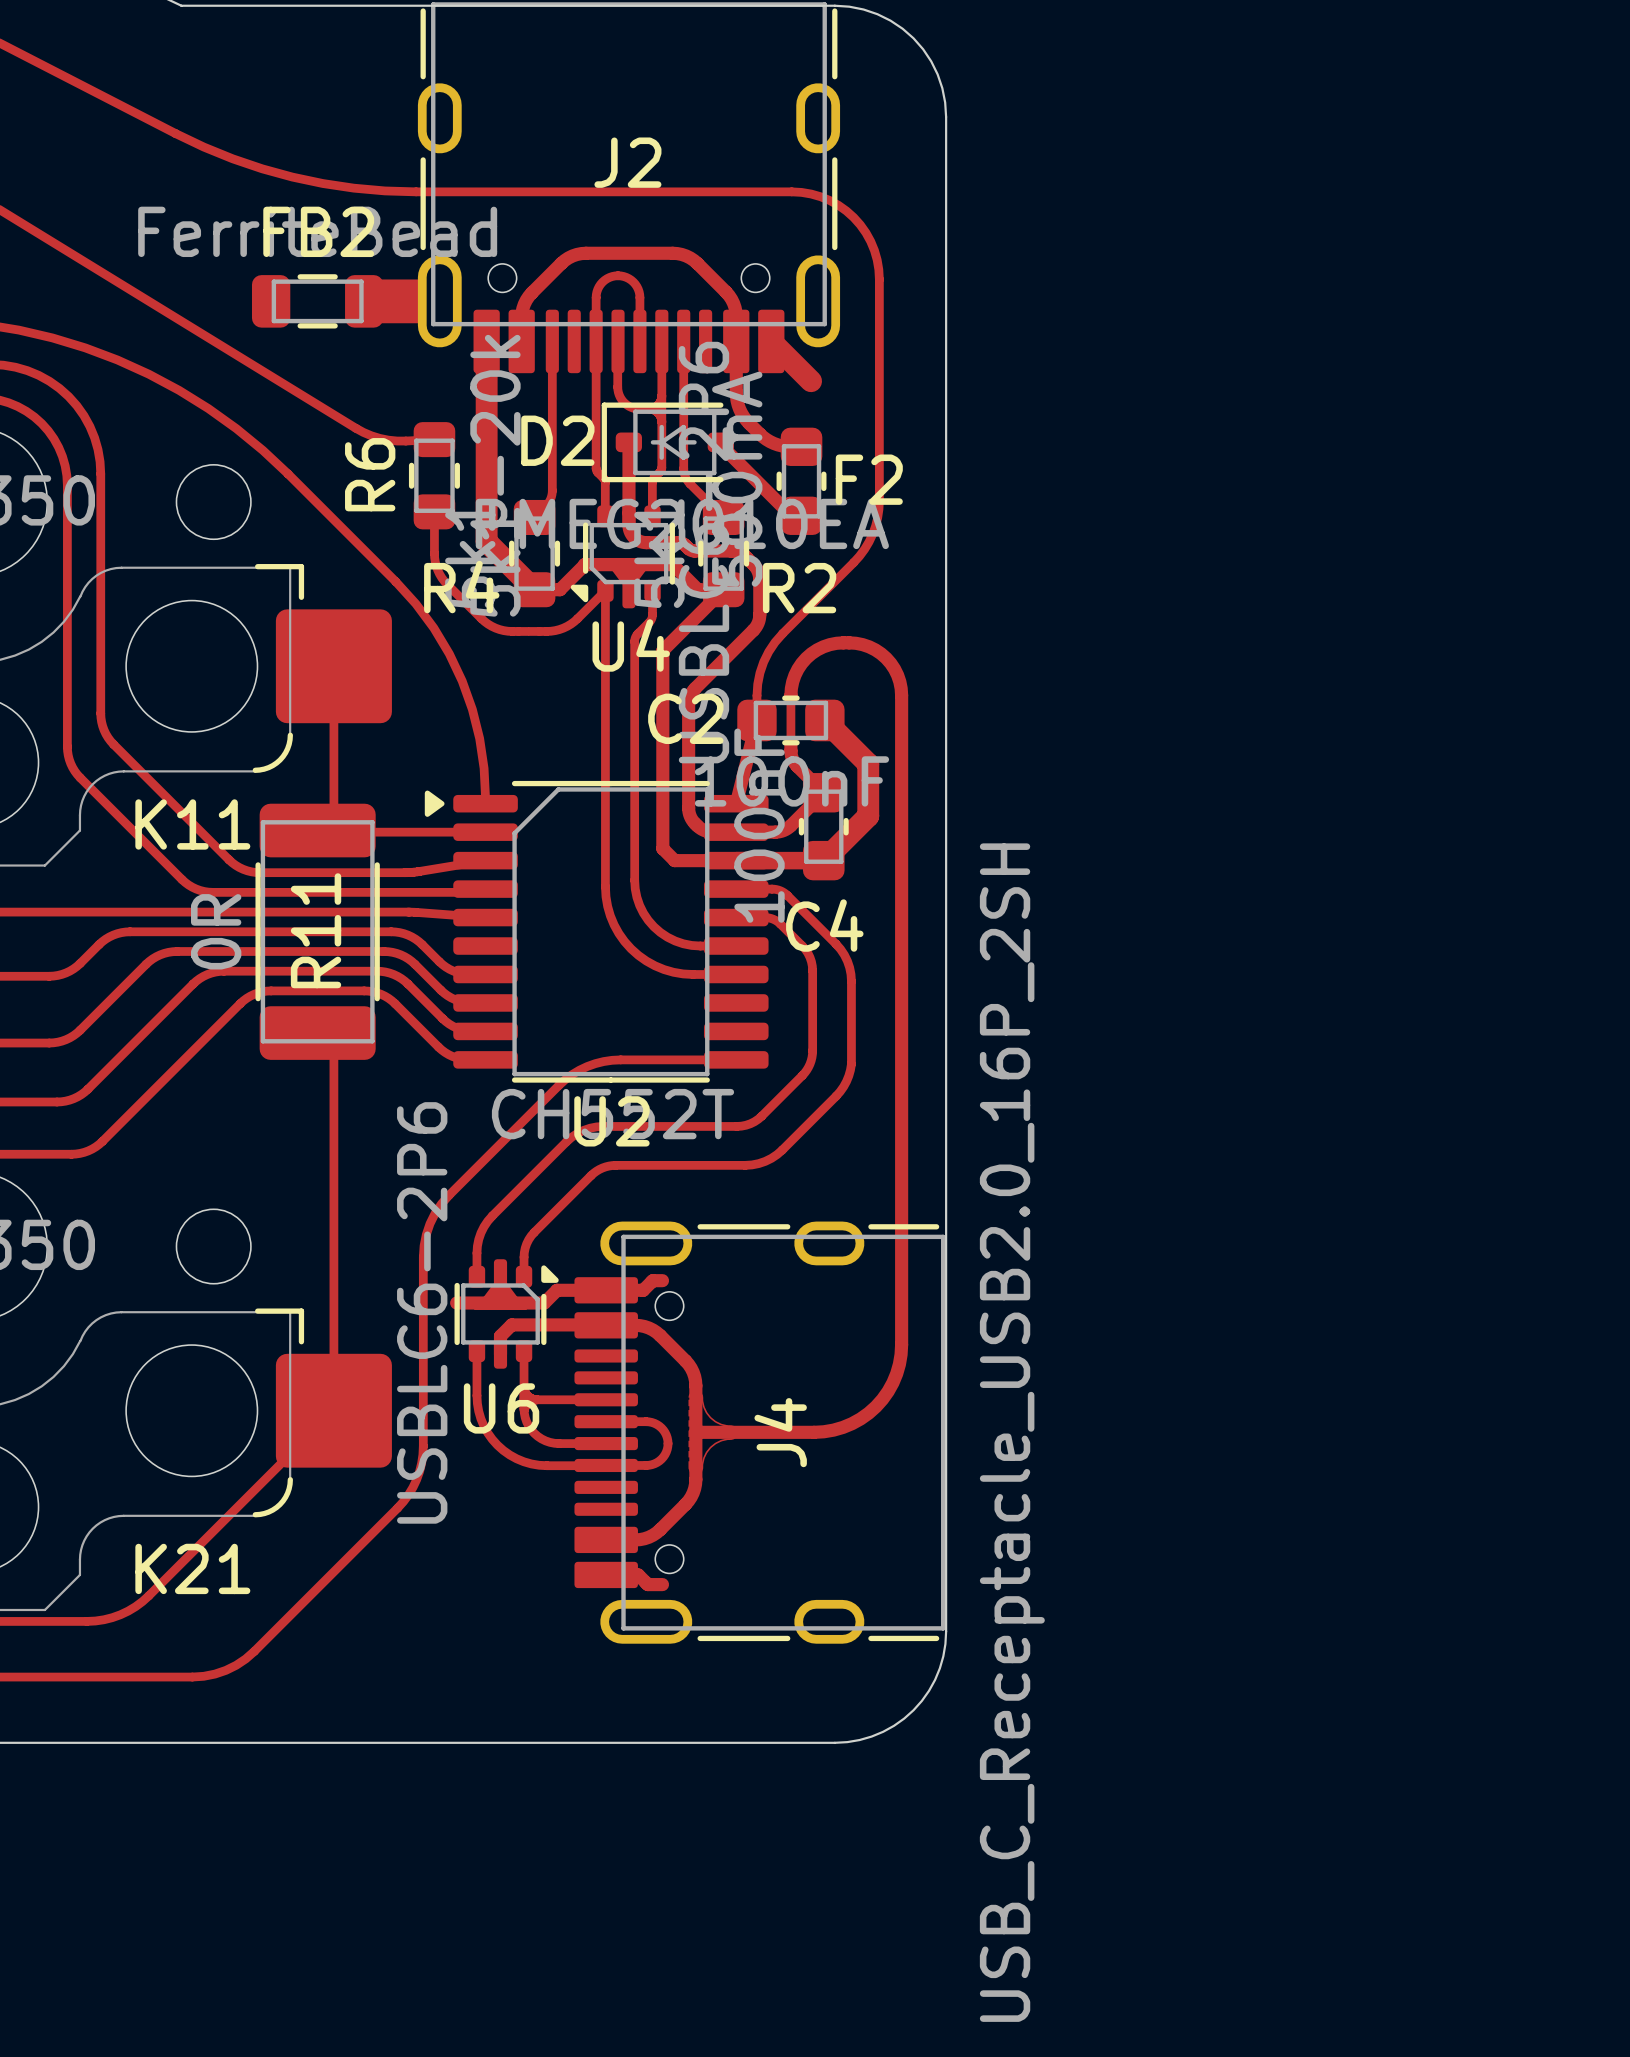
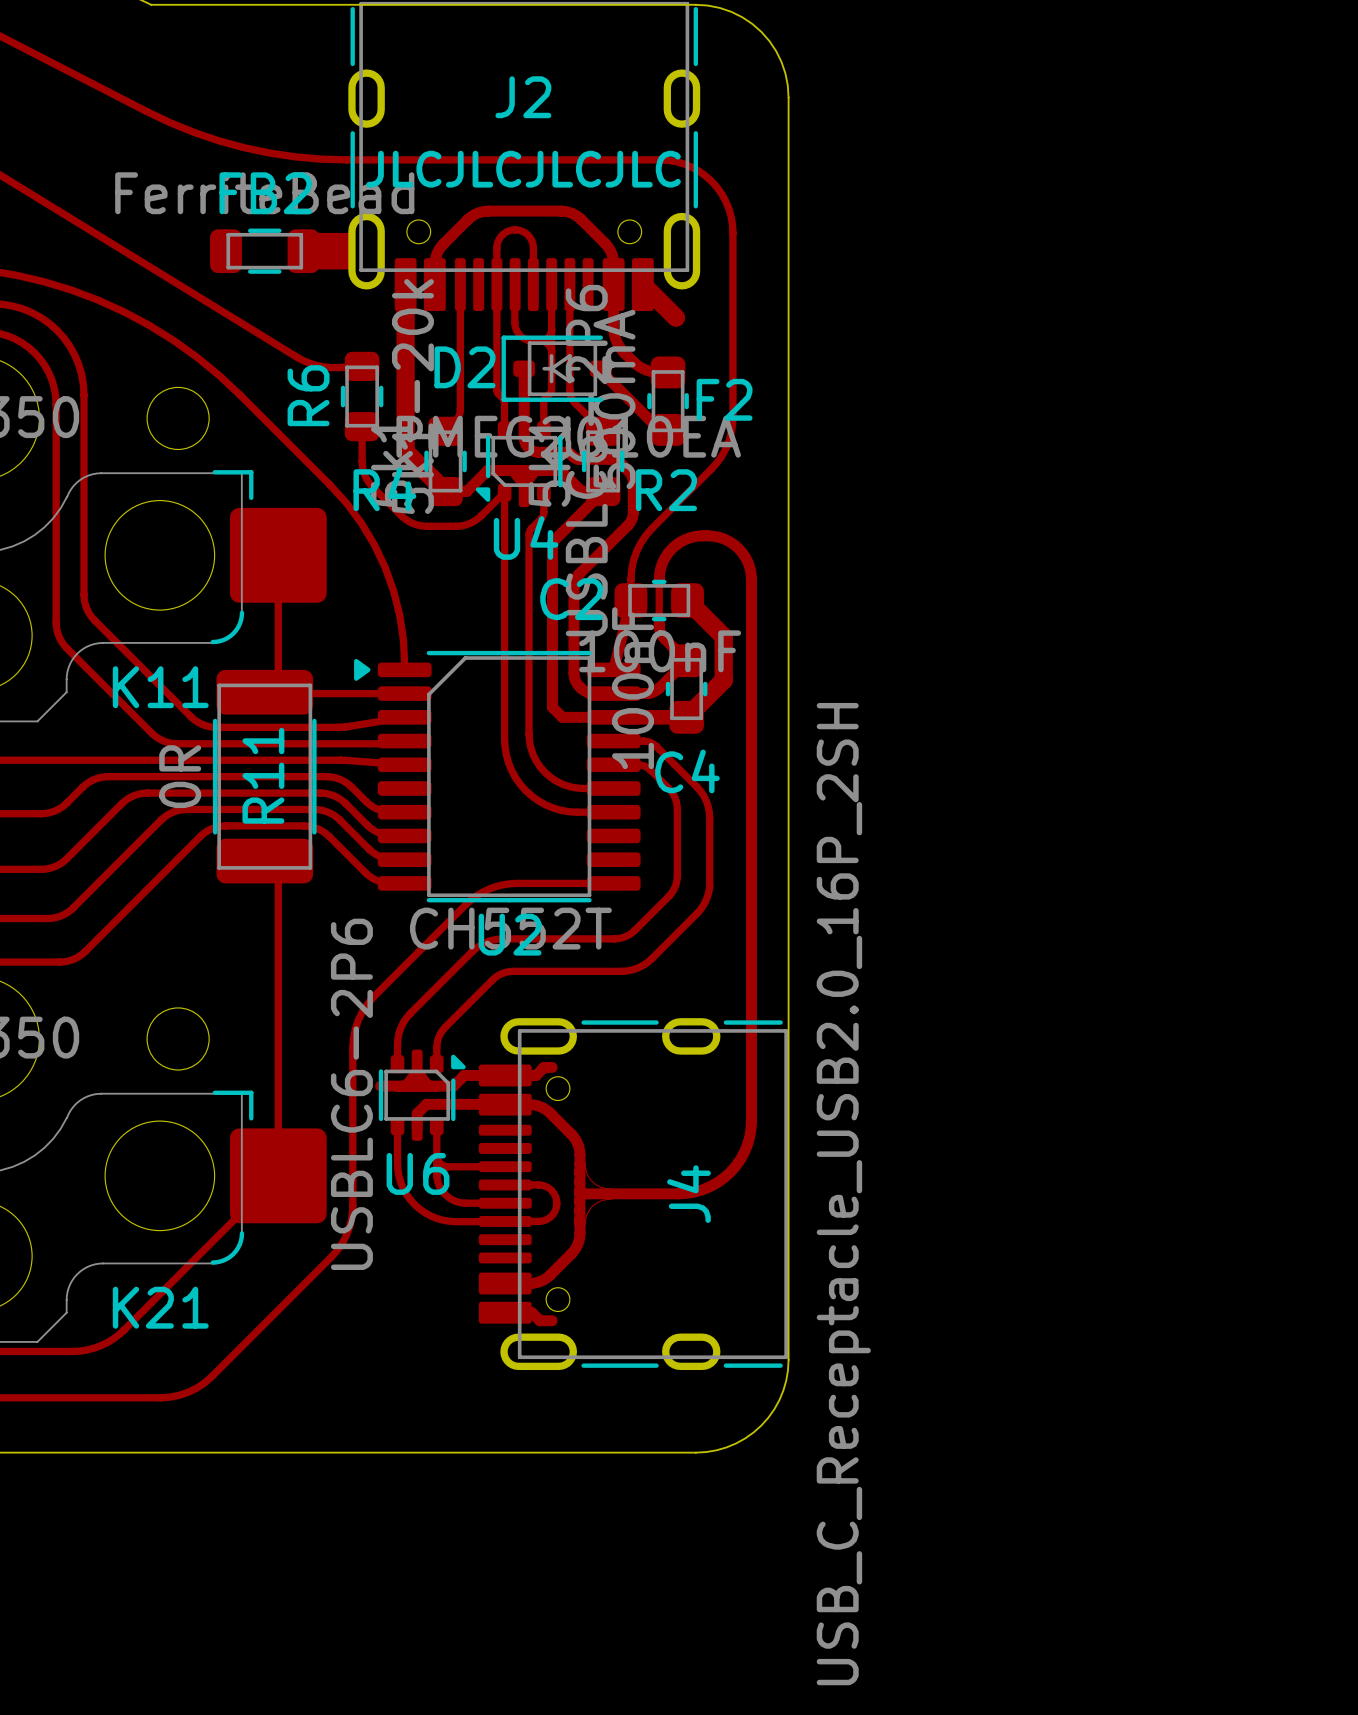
J2 name position: J2 (627, 162) -> J2 (523, 97)
text: none -> JLCJLCJLCJLC (523, 169)
J4 name position: J4 (780, 1432) -> J4 (689, 1194)

